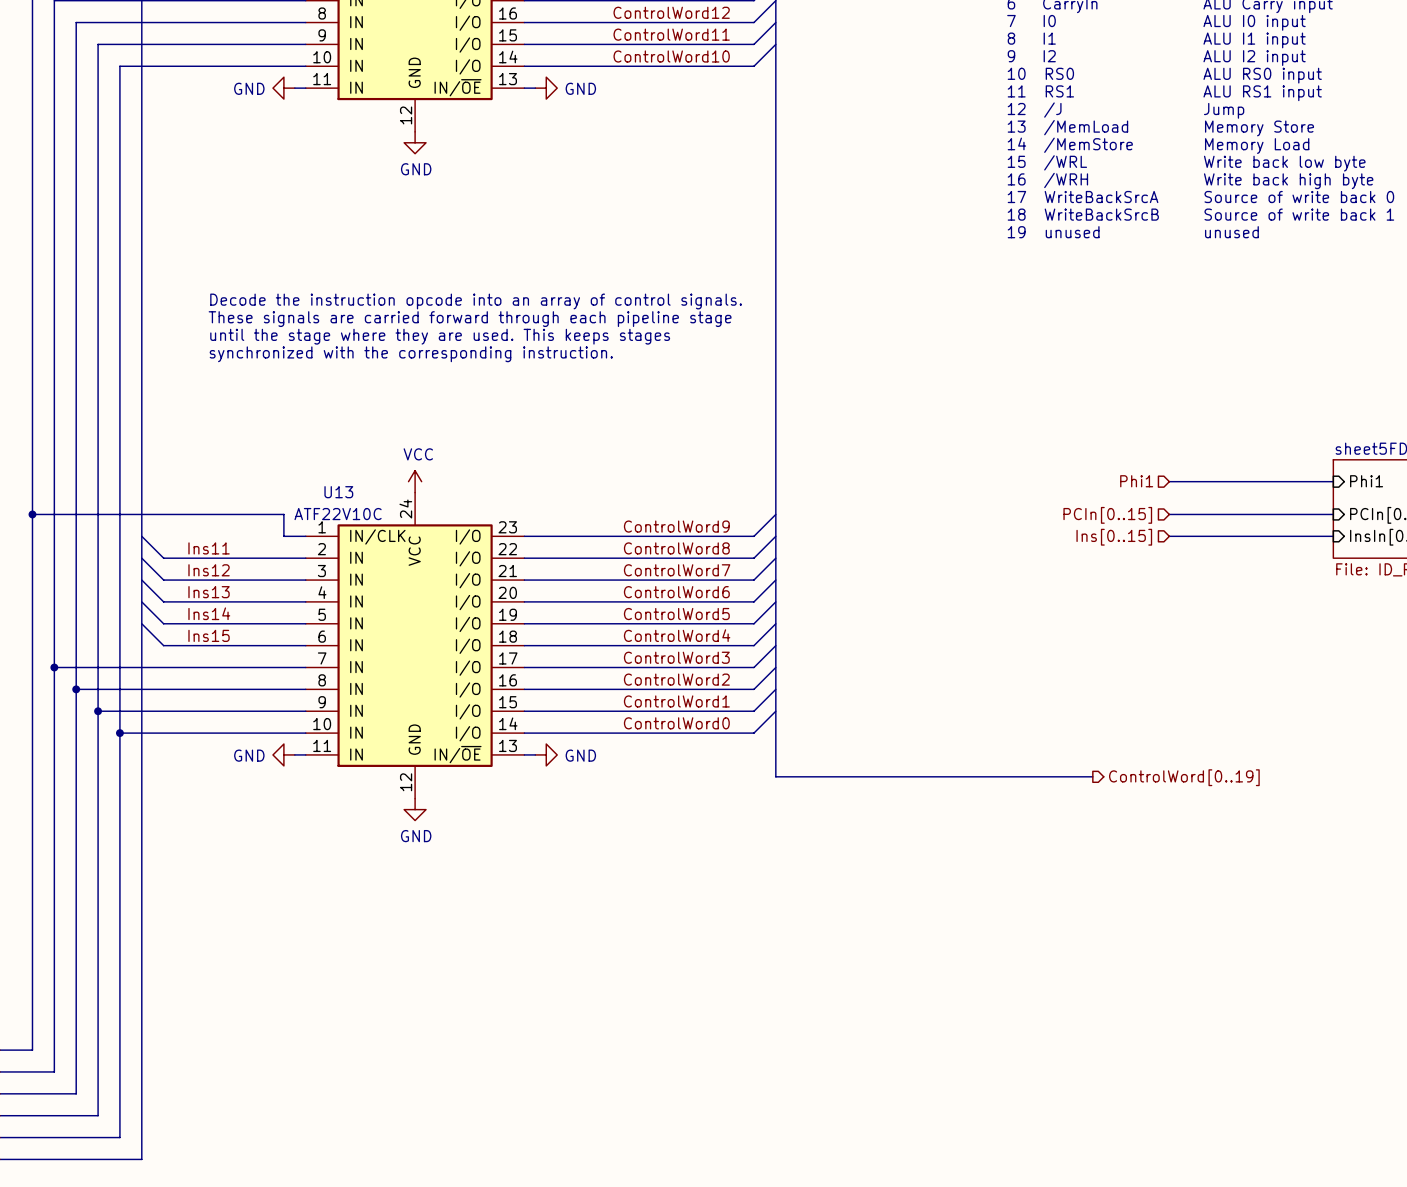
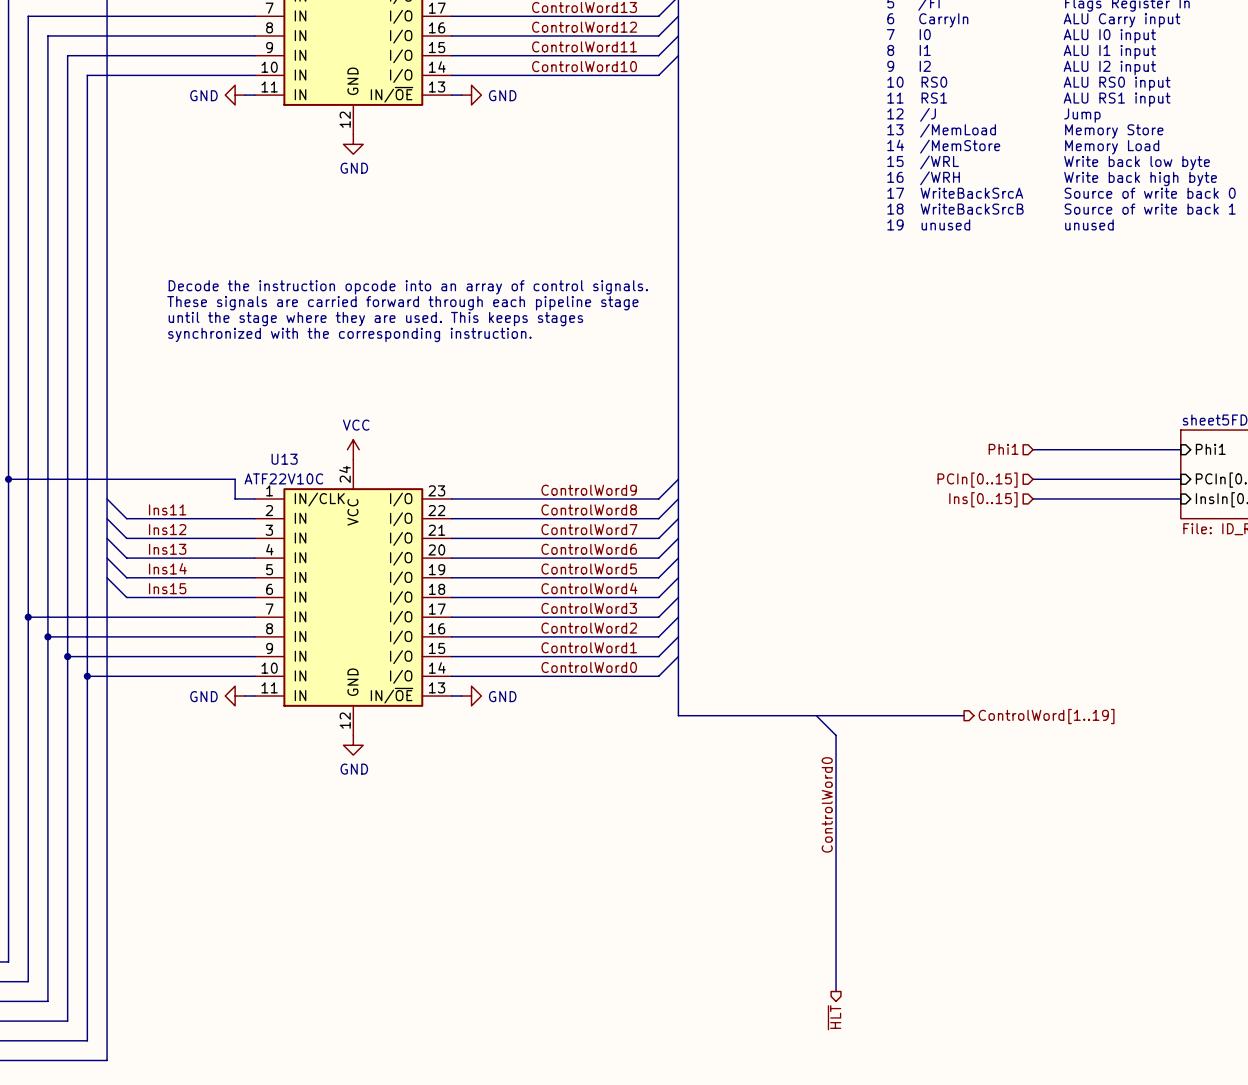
wire: none -> (816, 715) (836, 735) (836, 991)
hierarchical label: ControlWord[0..19] (1184, 777) -> ControlWord[1..19] (1046, 716)
label: none -> ControlWord0 (827, 804)
hierarchical label: none -> ~{HLT} (834, 1017)

